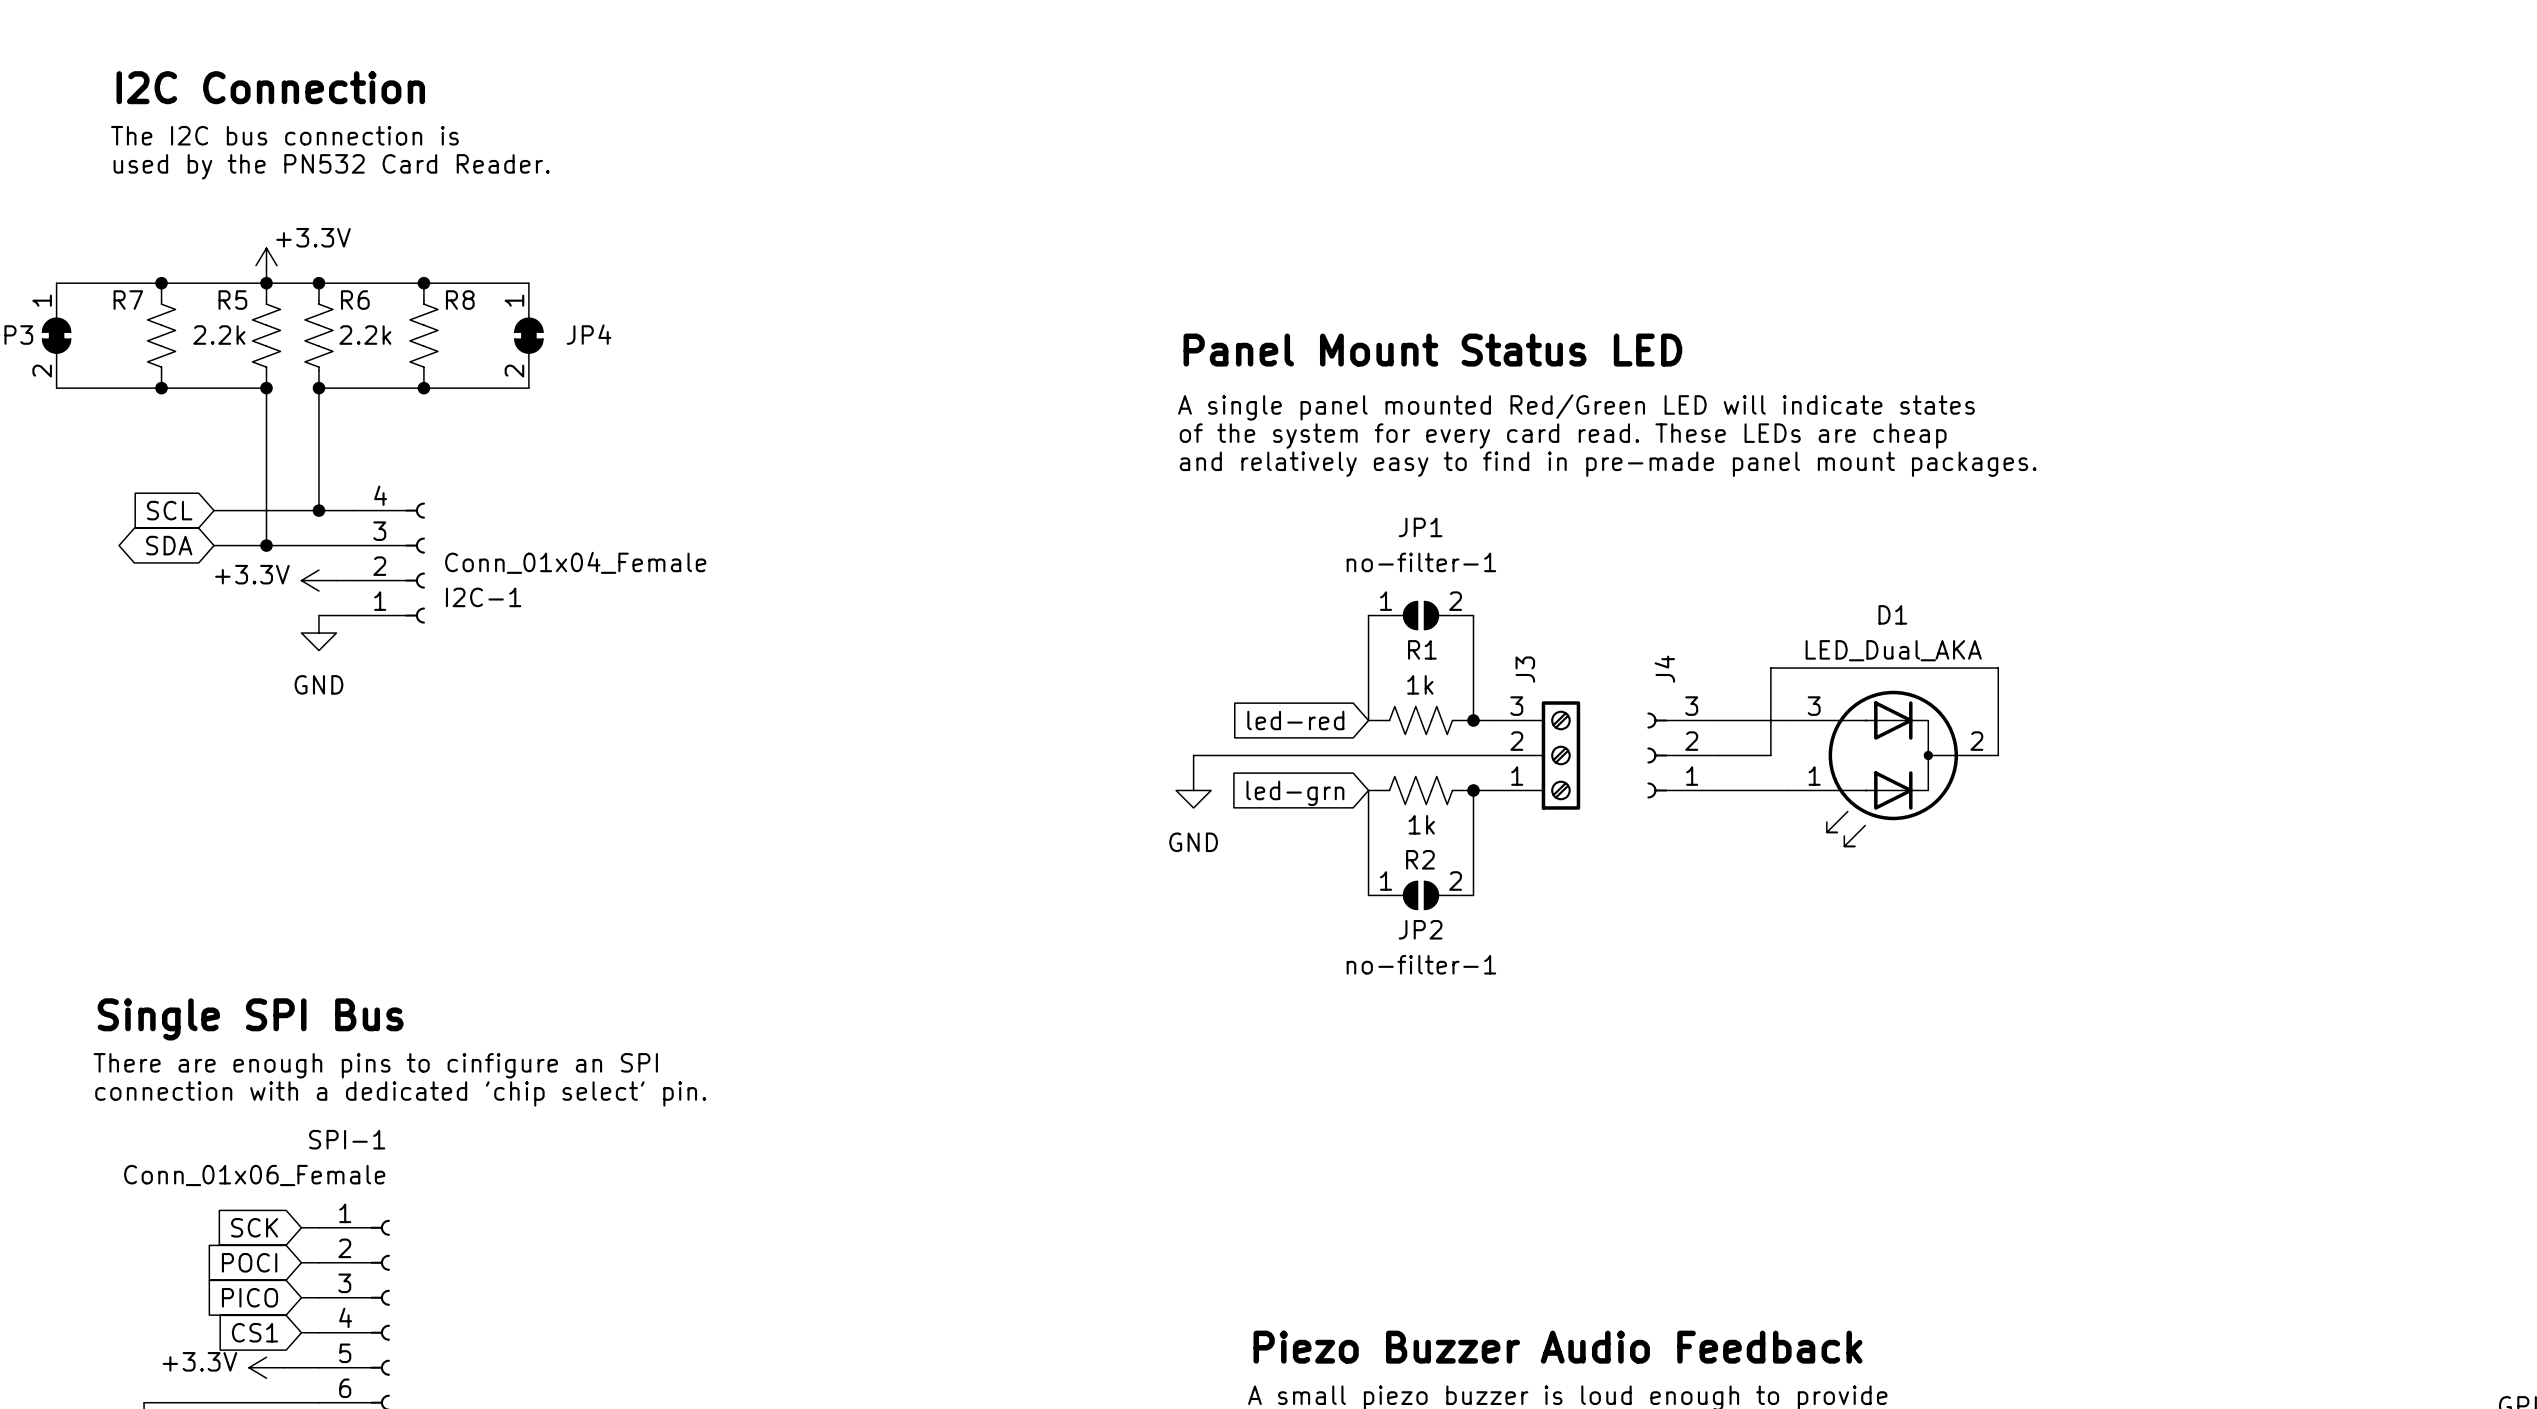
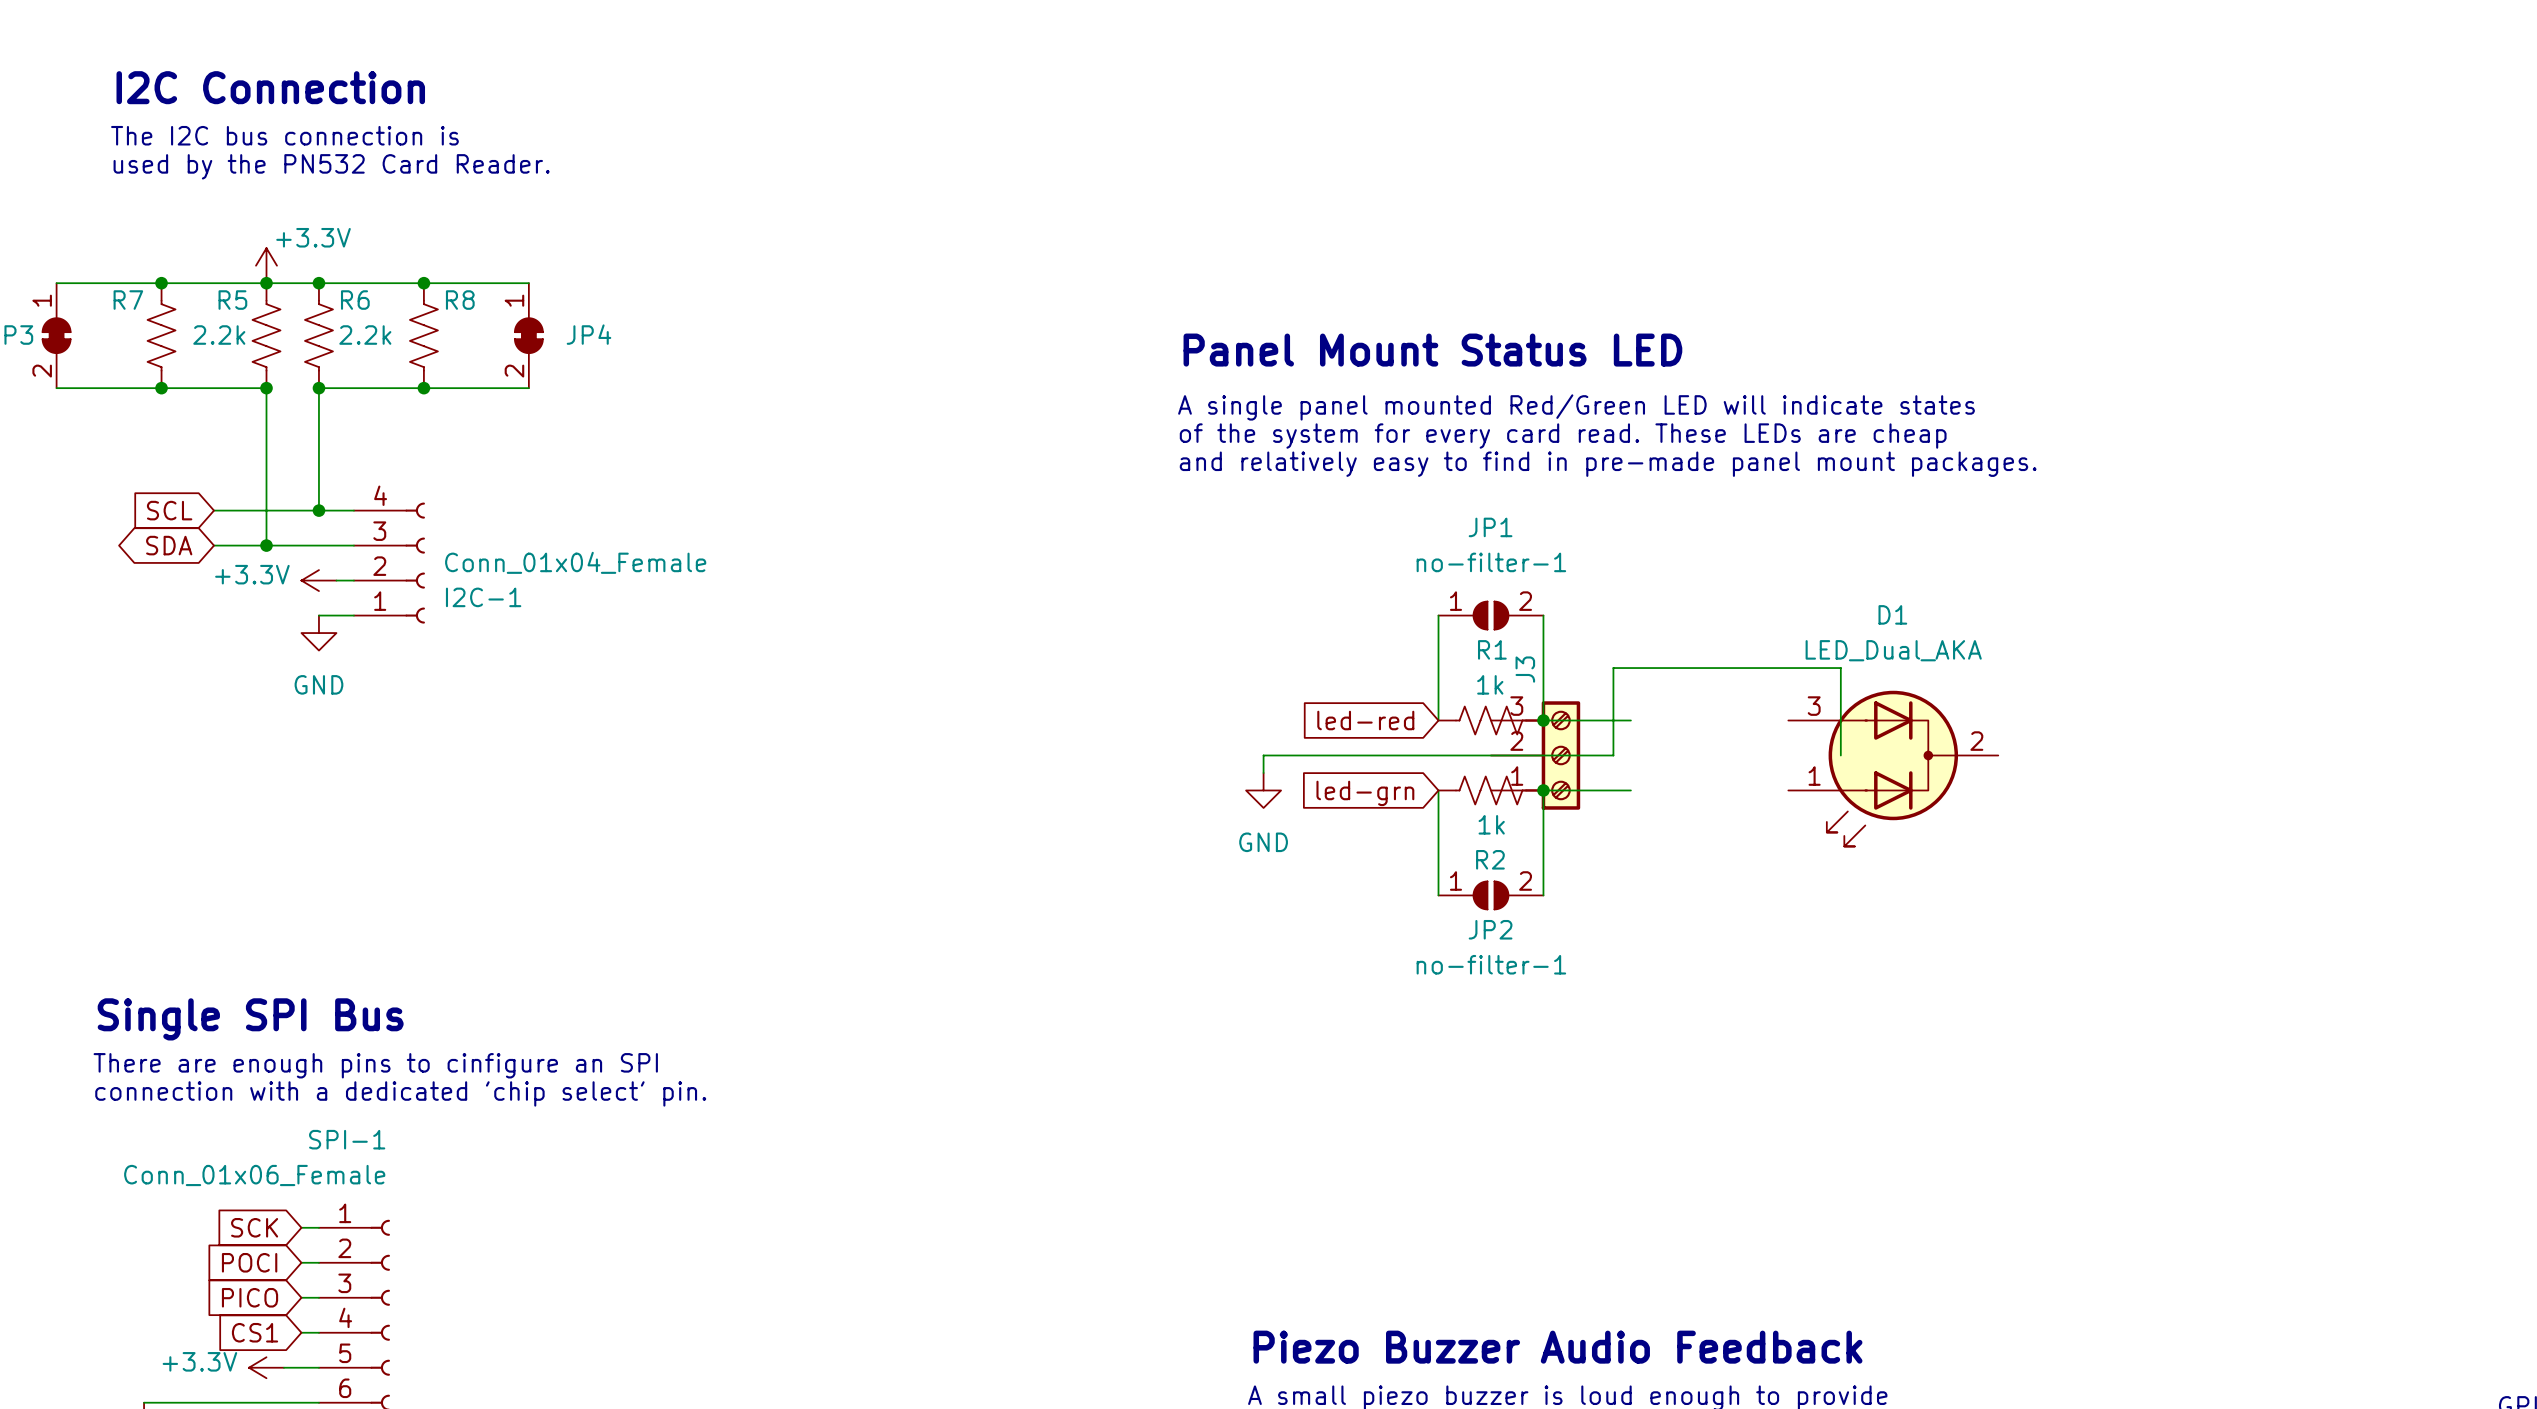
wire: (1368, 615) (1368, 720) -> (1438, 615) (1438, 720)
JP1 position: (1421, 615) -> (1490, 615)
wire: (1473, 615) (1473, 720) (1490, 720) -> none
wire: none -> (1543, 615) (1543, 720) (1630, 720)
wire: (1770, 668) (1770, 755) (1718, 755) -> (1770, 668) (1613, 668) (1613, 755) (1490, 755)
wire: (1840, 668) (1998, 668) (1998, 755) -> (1840, 668) (1840, 755)
global label position: led-red (1295, 720) -> led-red (1365, 720)
R1 position: (1421, 720) -> (1490, 720)
junction: (1473, 720) -> none
junction: none -> (1543, 720)
wire: (1718, 720) (1788, 720) -> none
wire: (1263, 755) (1193, 755) (1193, 772) -> (1263, 755) (1263, 772)
J4: (1682, 755) -> none
power symbol position: GND (1193, 790) -> GND (1263, 790)
wire: (1368, 790) (1368, 895) -> (1438, 790) (1438, 895)
R2 position: (1421, 790) -> (1490, 790)
junction: (1473, 790) -> none
wire: (1490, 790) (1473, 790) (1473, 895) -> none
junction: none -> (1543, 790)
wire: none -> (1630, 790) (1543, 790) (1543, 895)
wire: (1718, 790) (1788, 790) -> none
global label position: led-grn (1295, 793) -> led-grn (1365, 793)
JP2 position: (1421, 895) -> (1490, 895)

